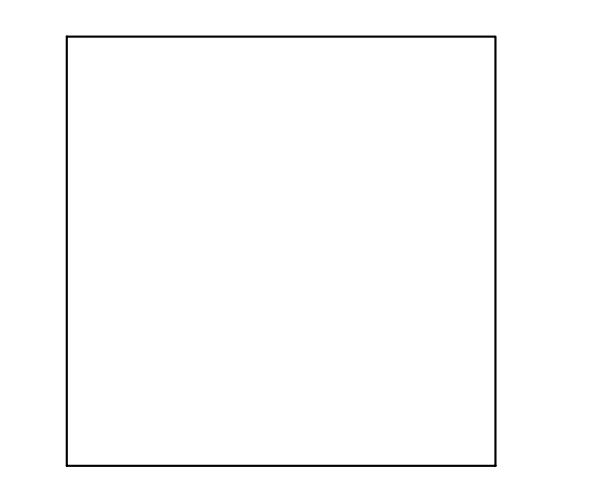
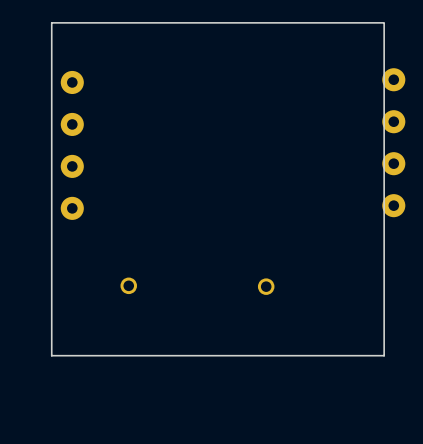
part: none -> (393, 142)
part: none -> (72, 145)
part: none -> (128, 285)
part: none -> (266, 286)

